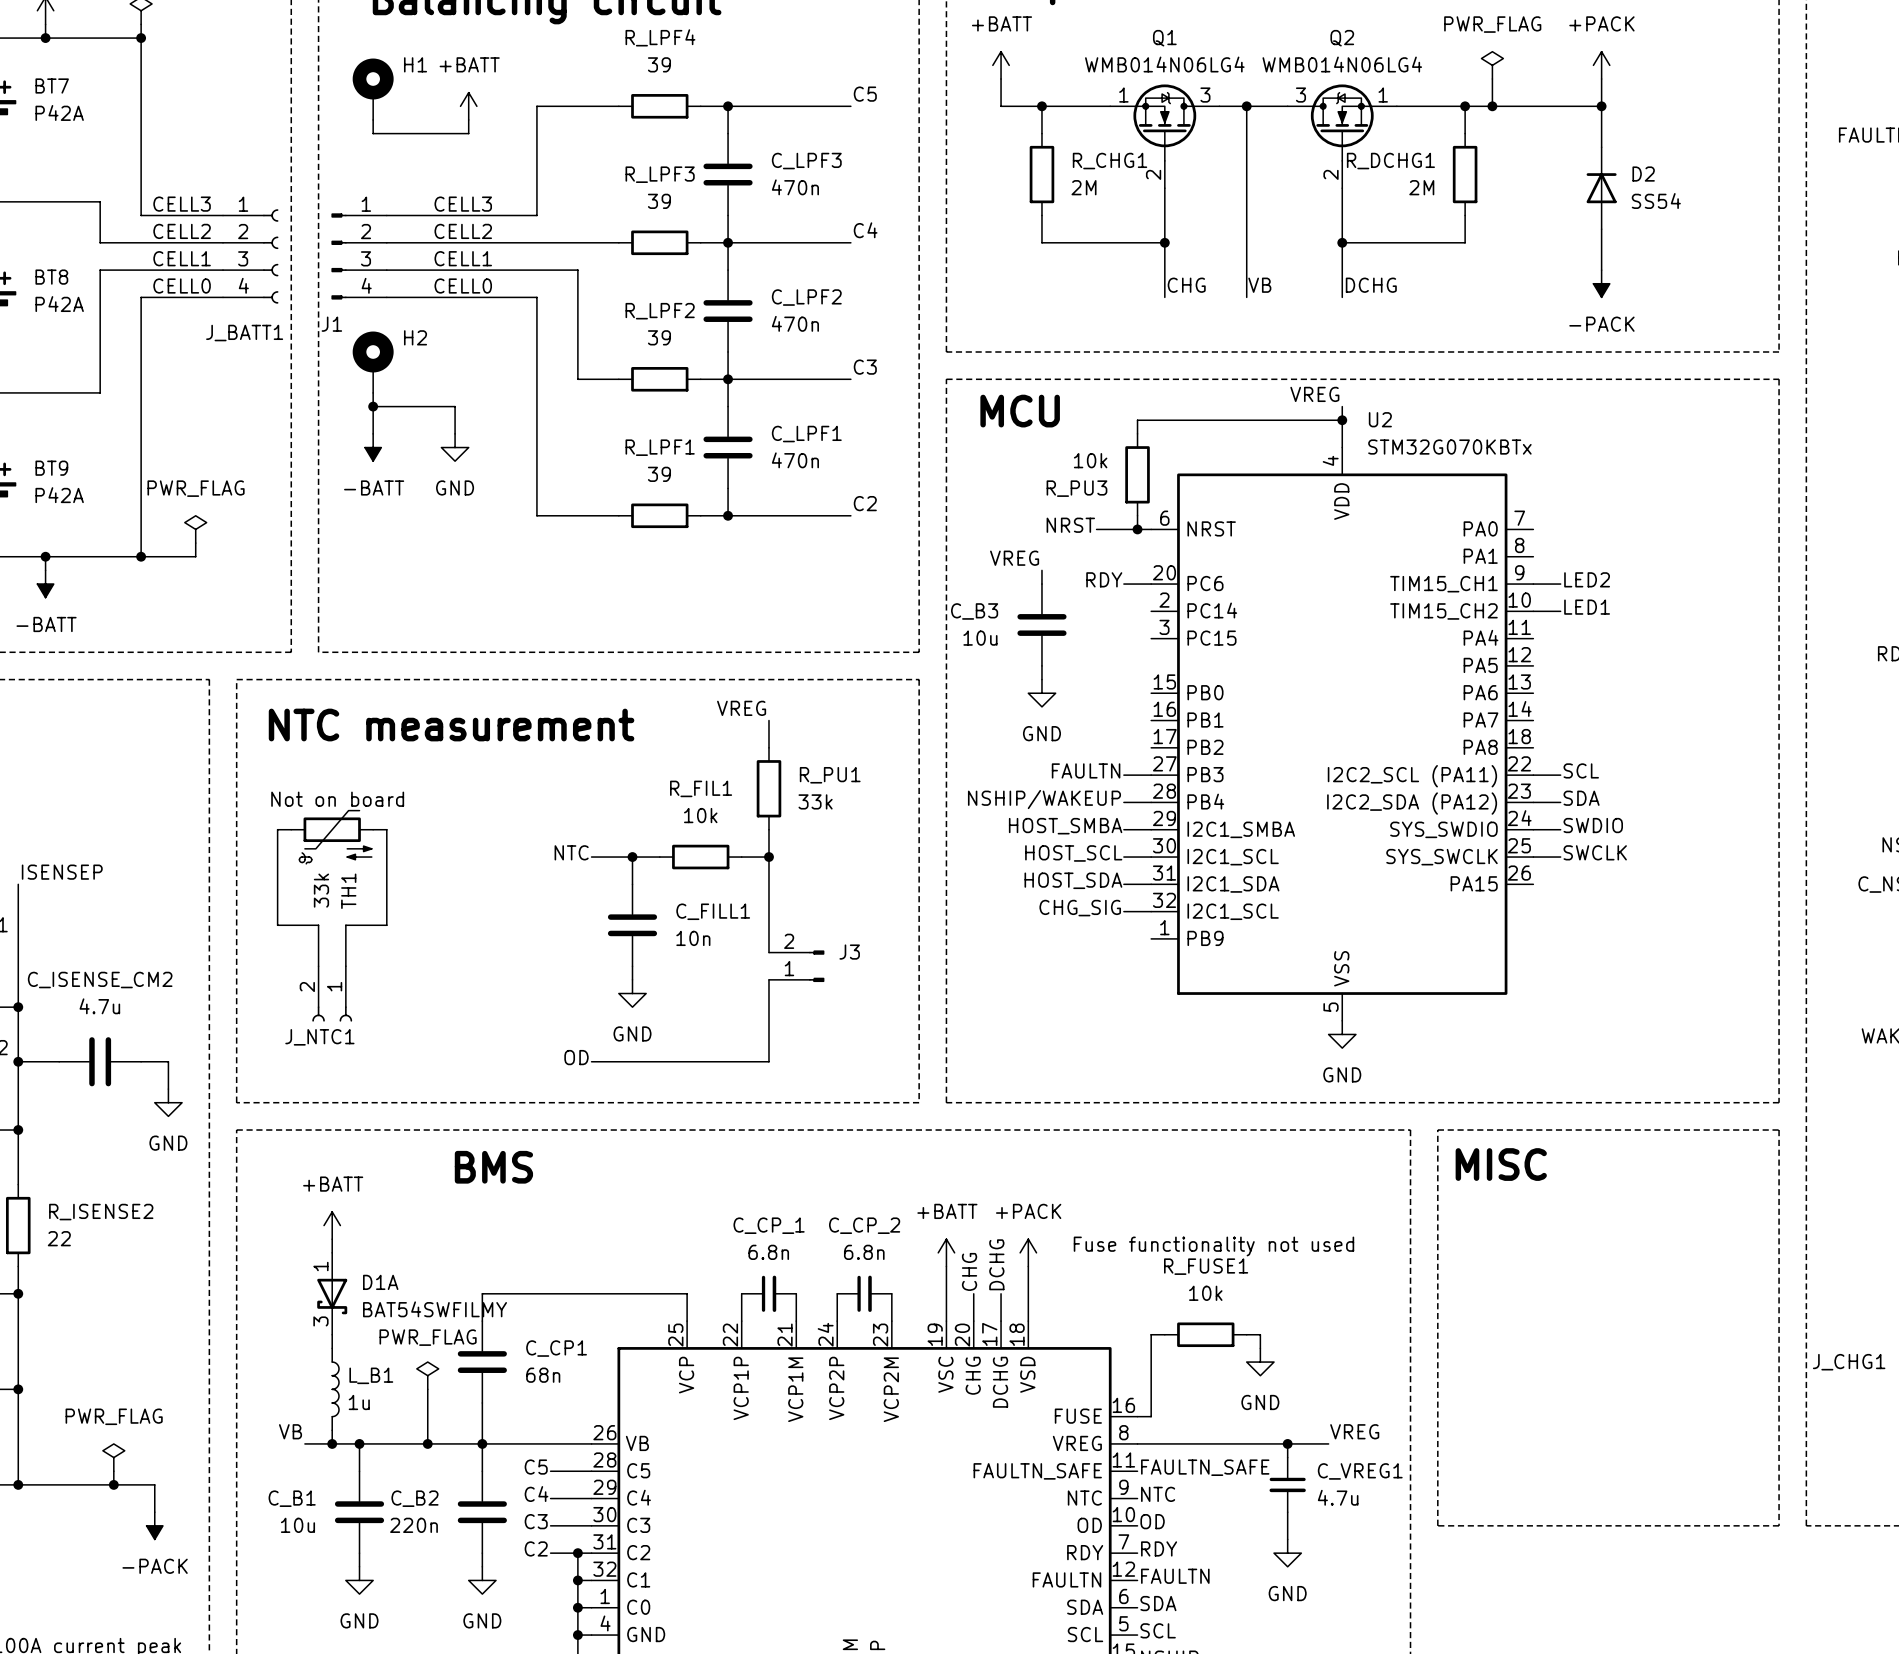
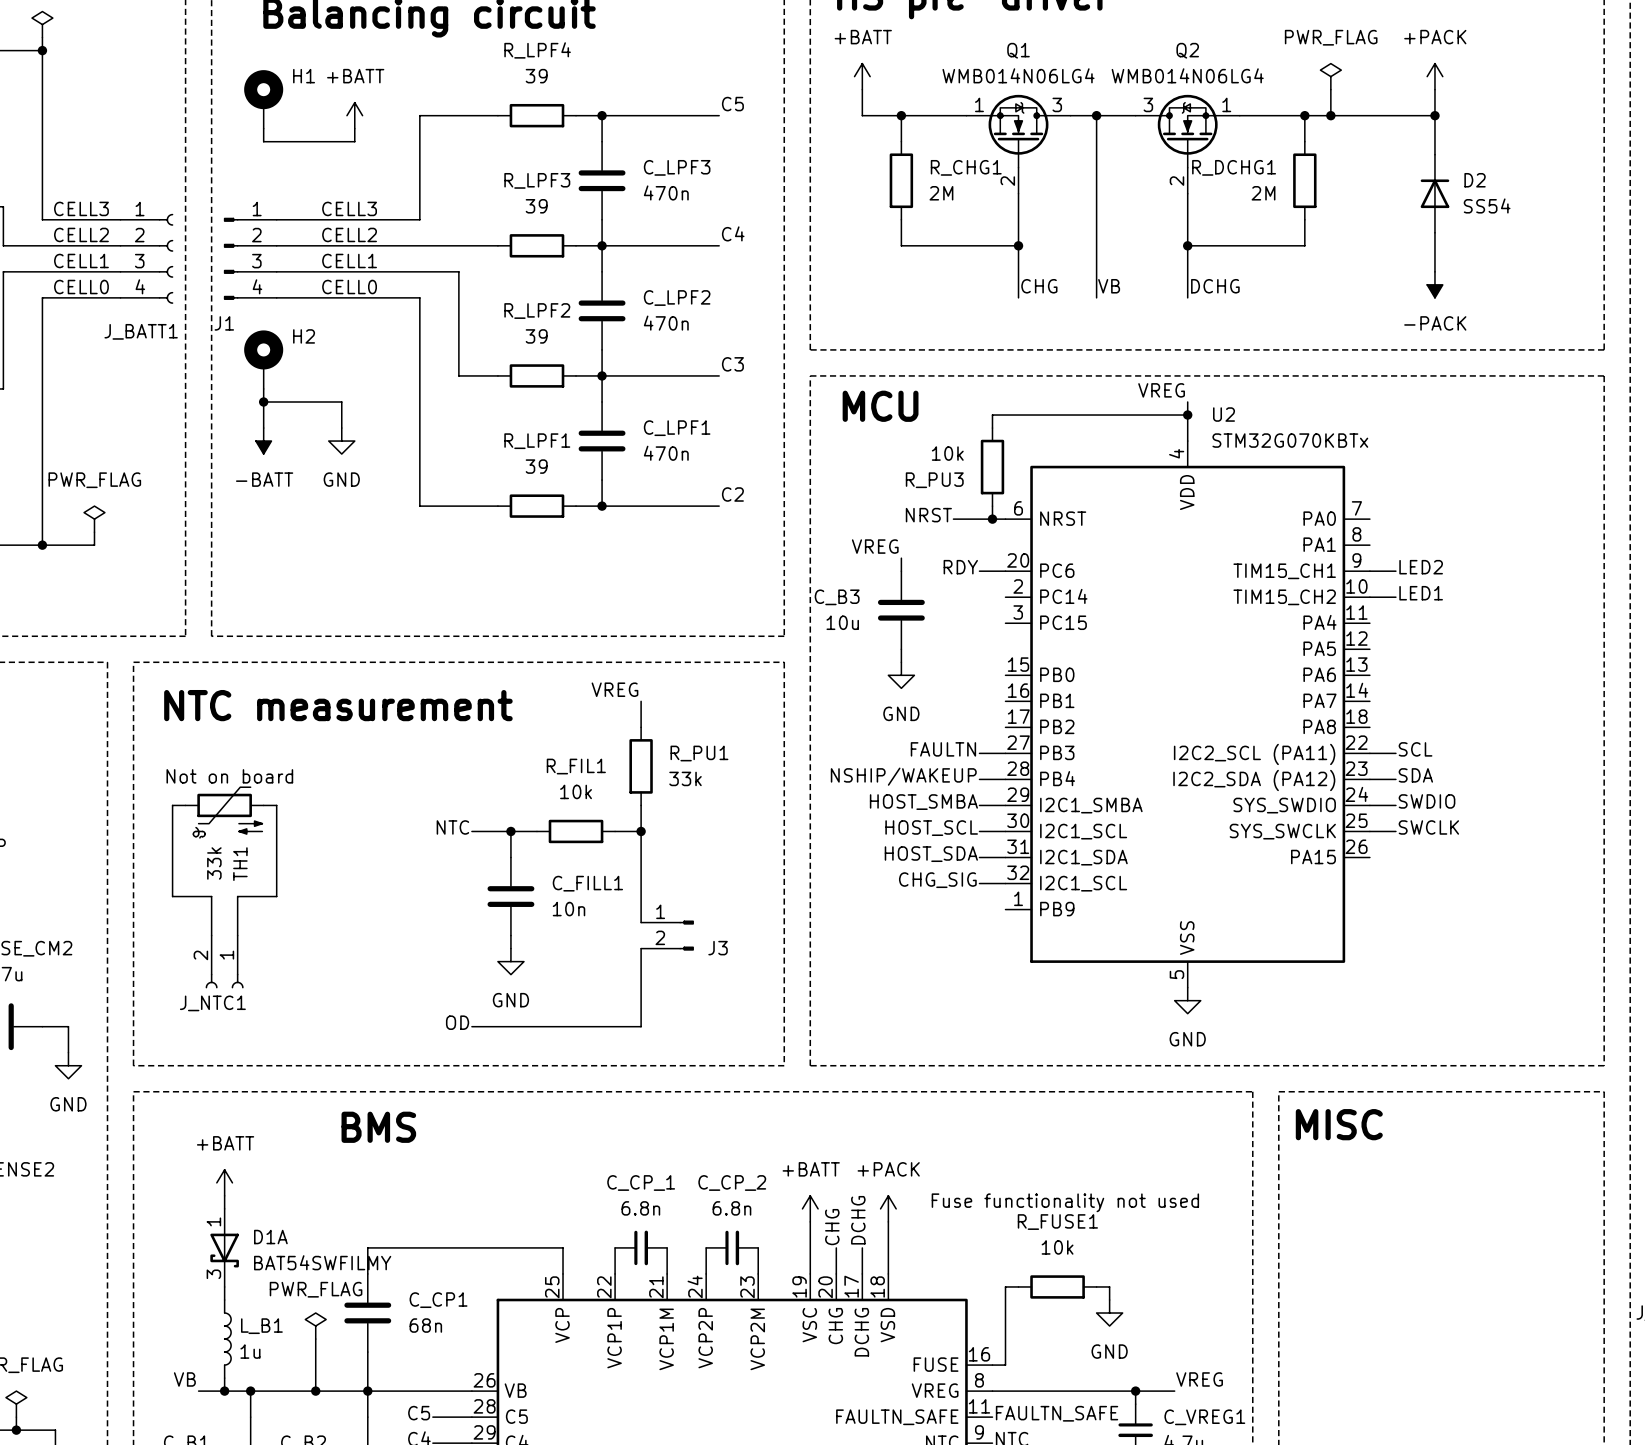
J3 flip: as is (816, 966) -> up-down (686, 935)

